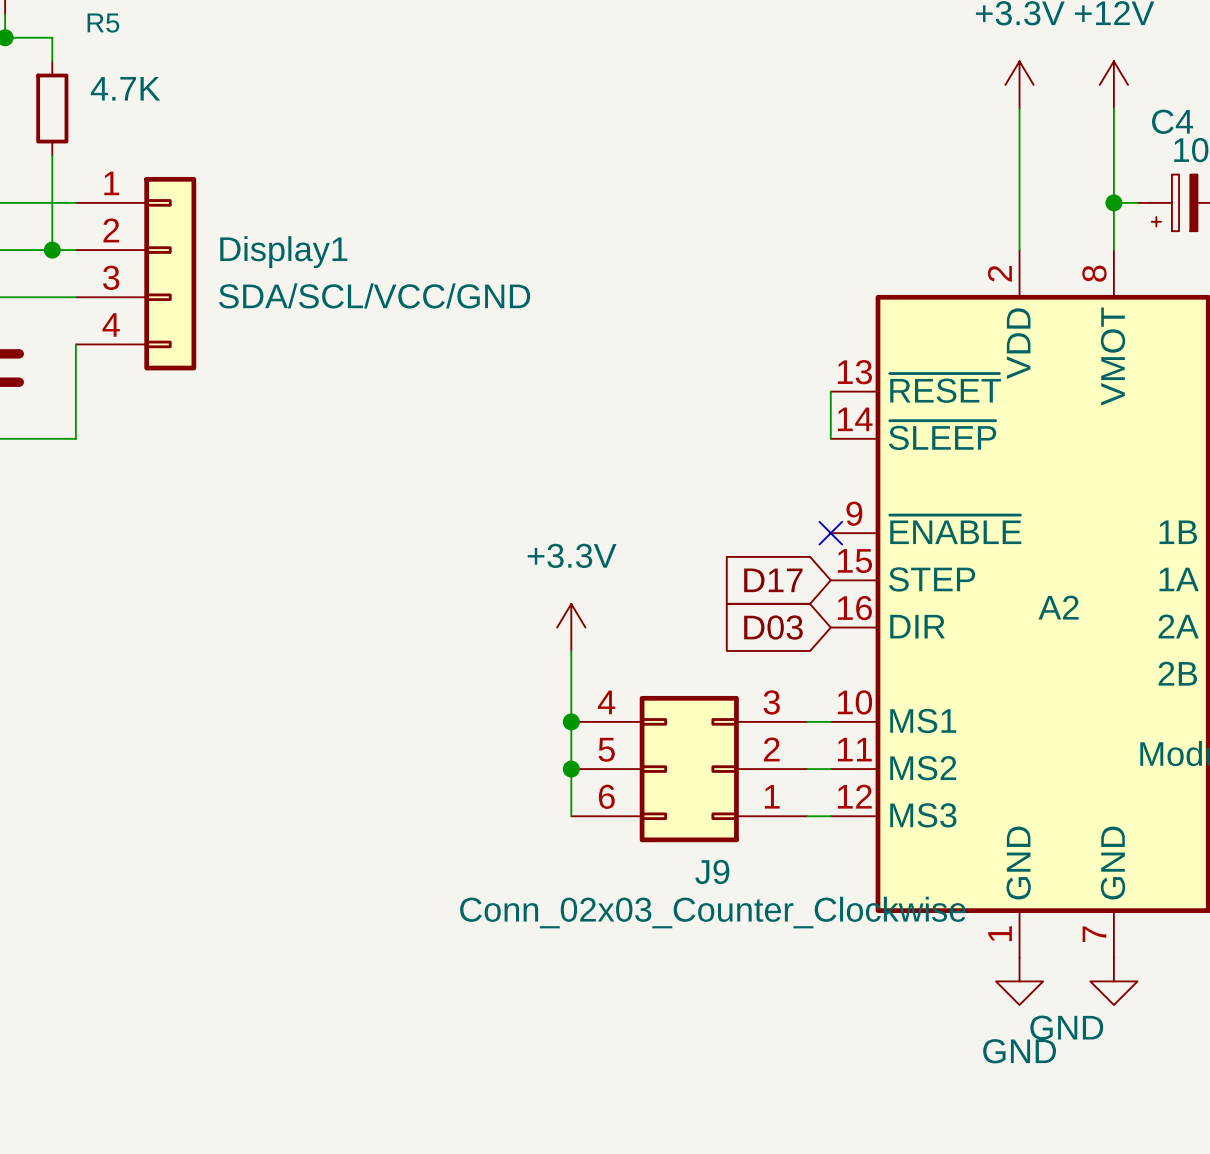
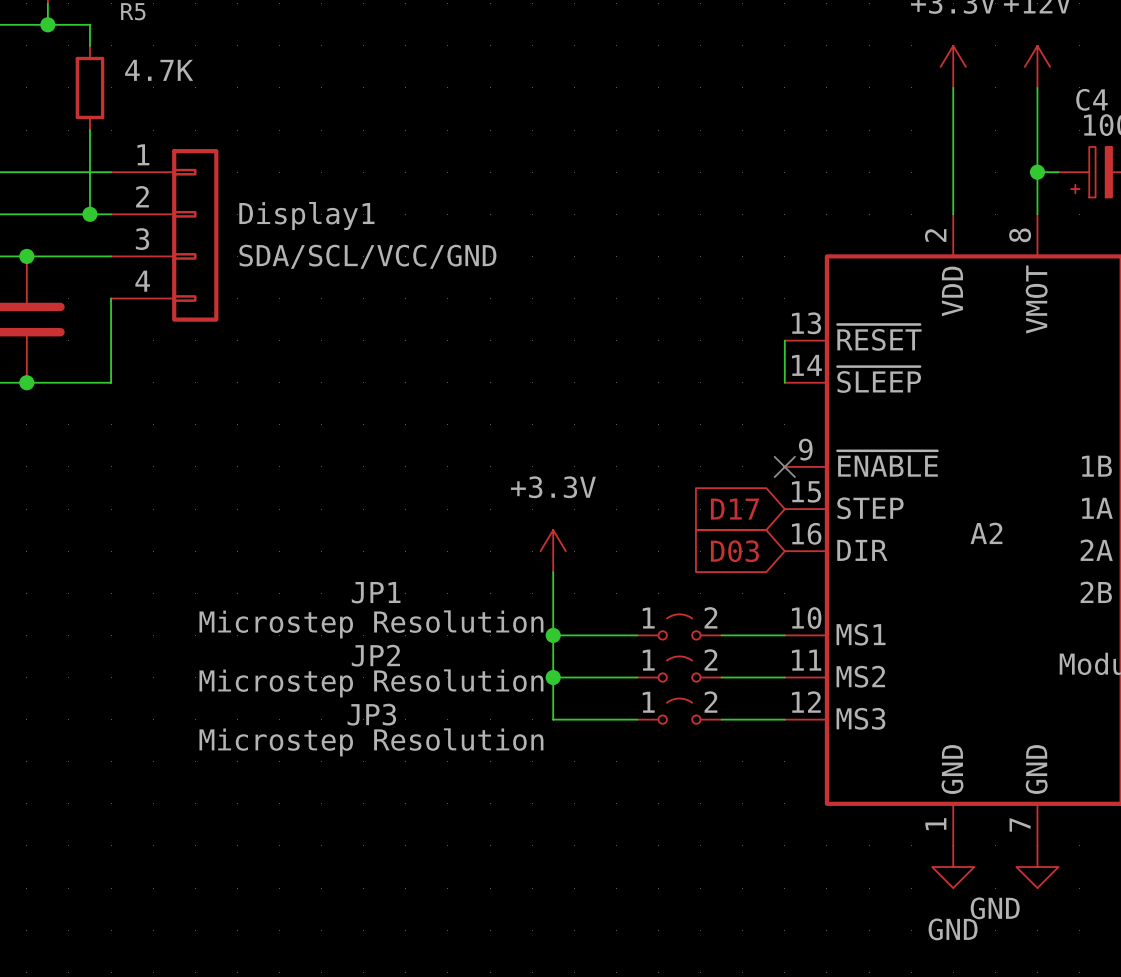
JP1: none -> Microstep Resolution (679, 626)
JP2: none -> Microstep Resolution (679, 669)
J9: Conn_02x03_Counter_Clockwise (689, 769) -> none
JP3: none -> Microstep Resolution (679, 711)

